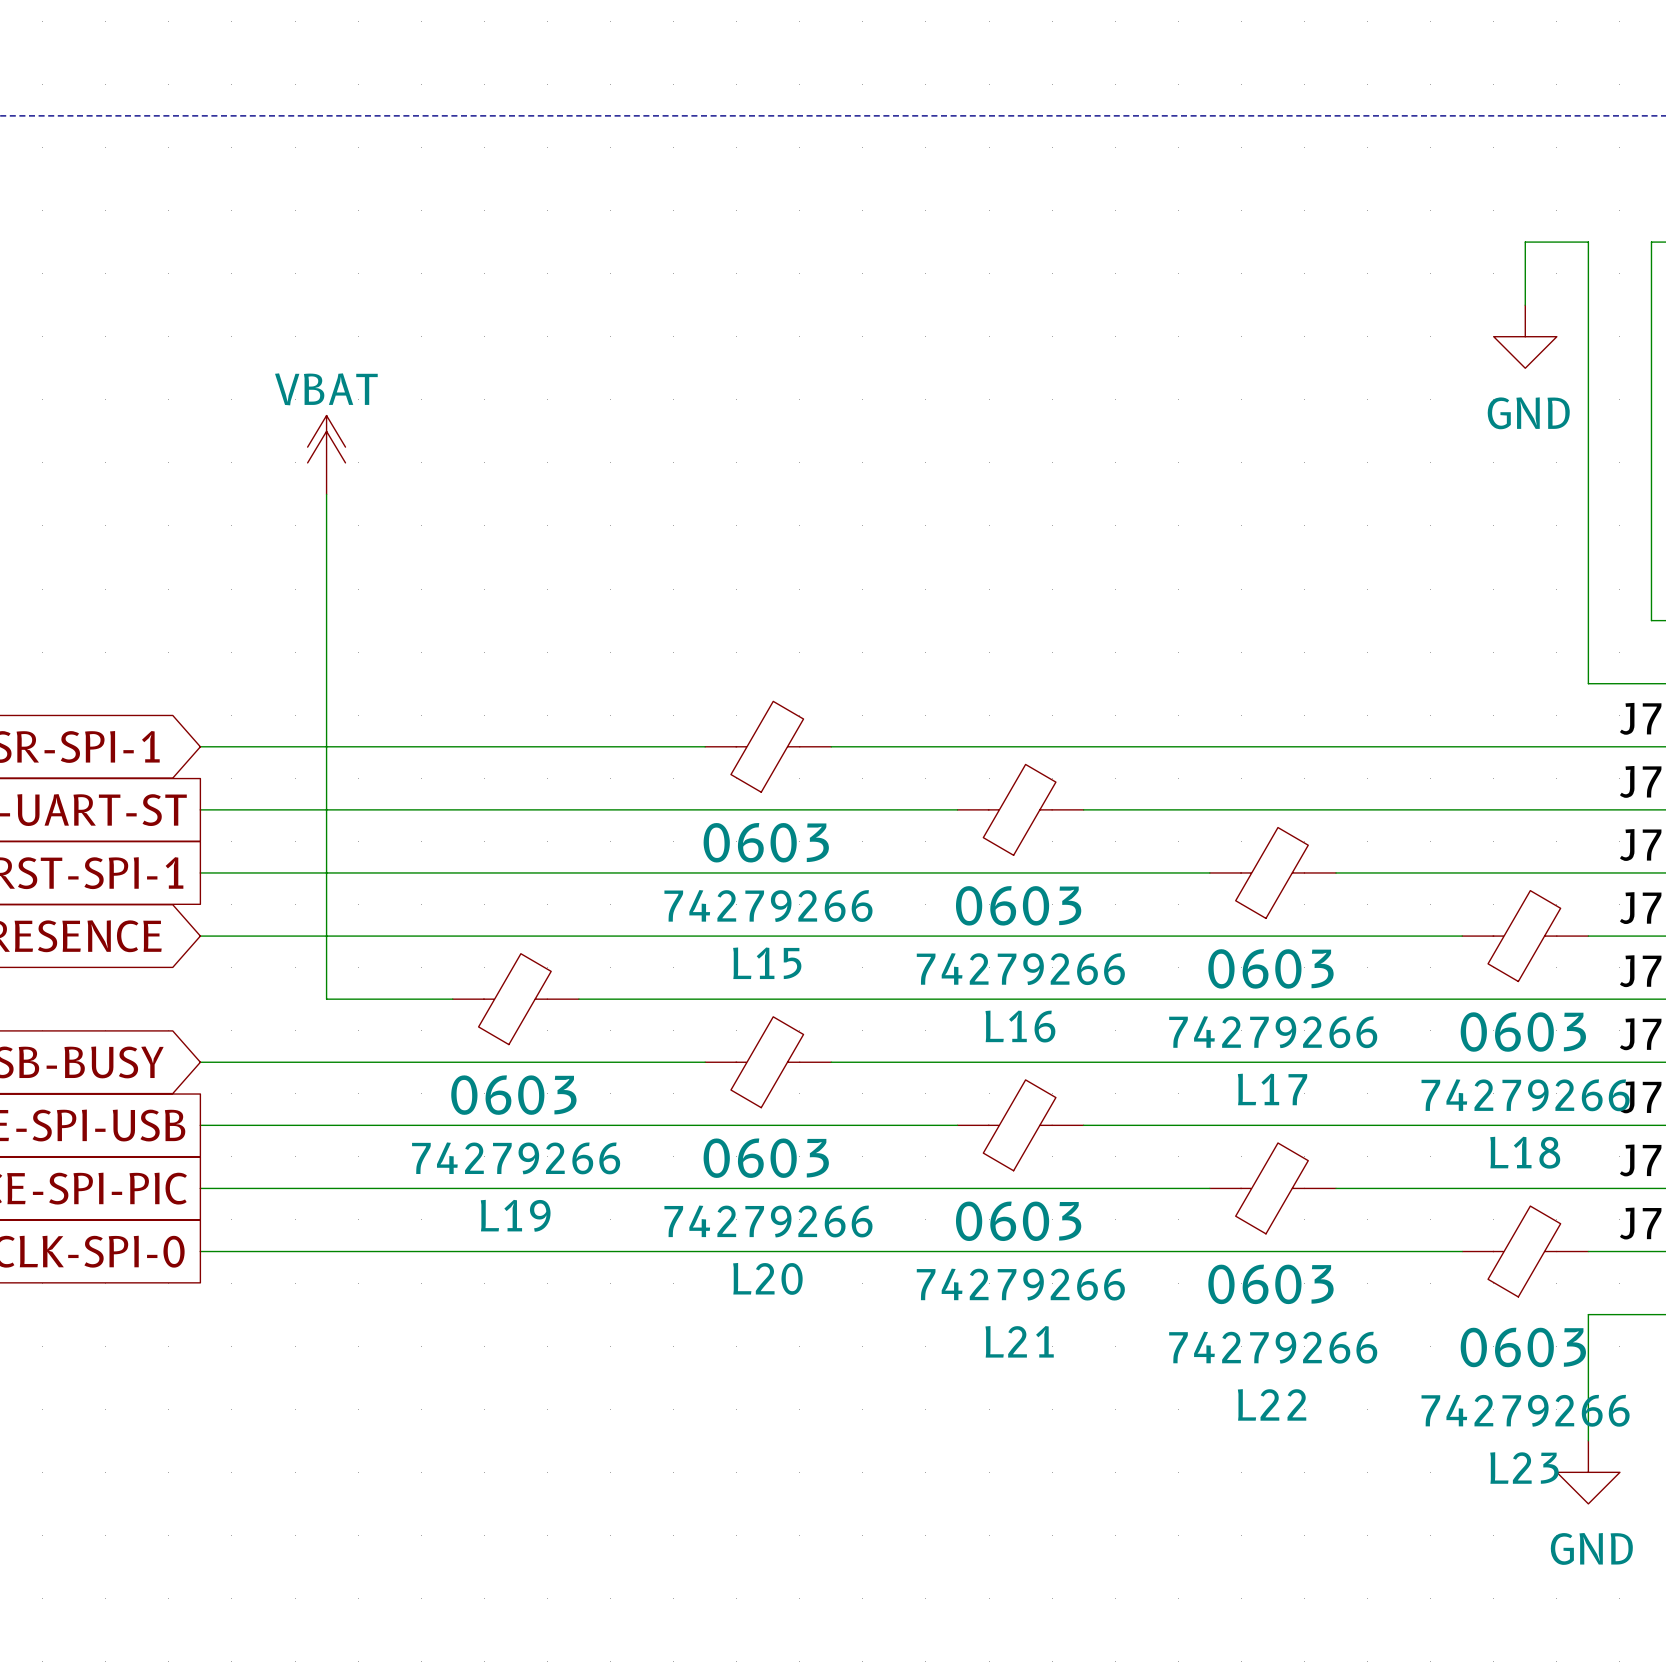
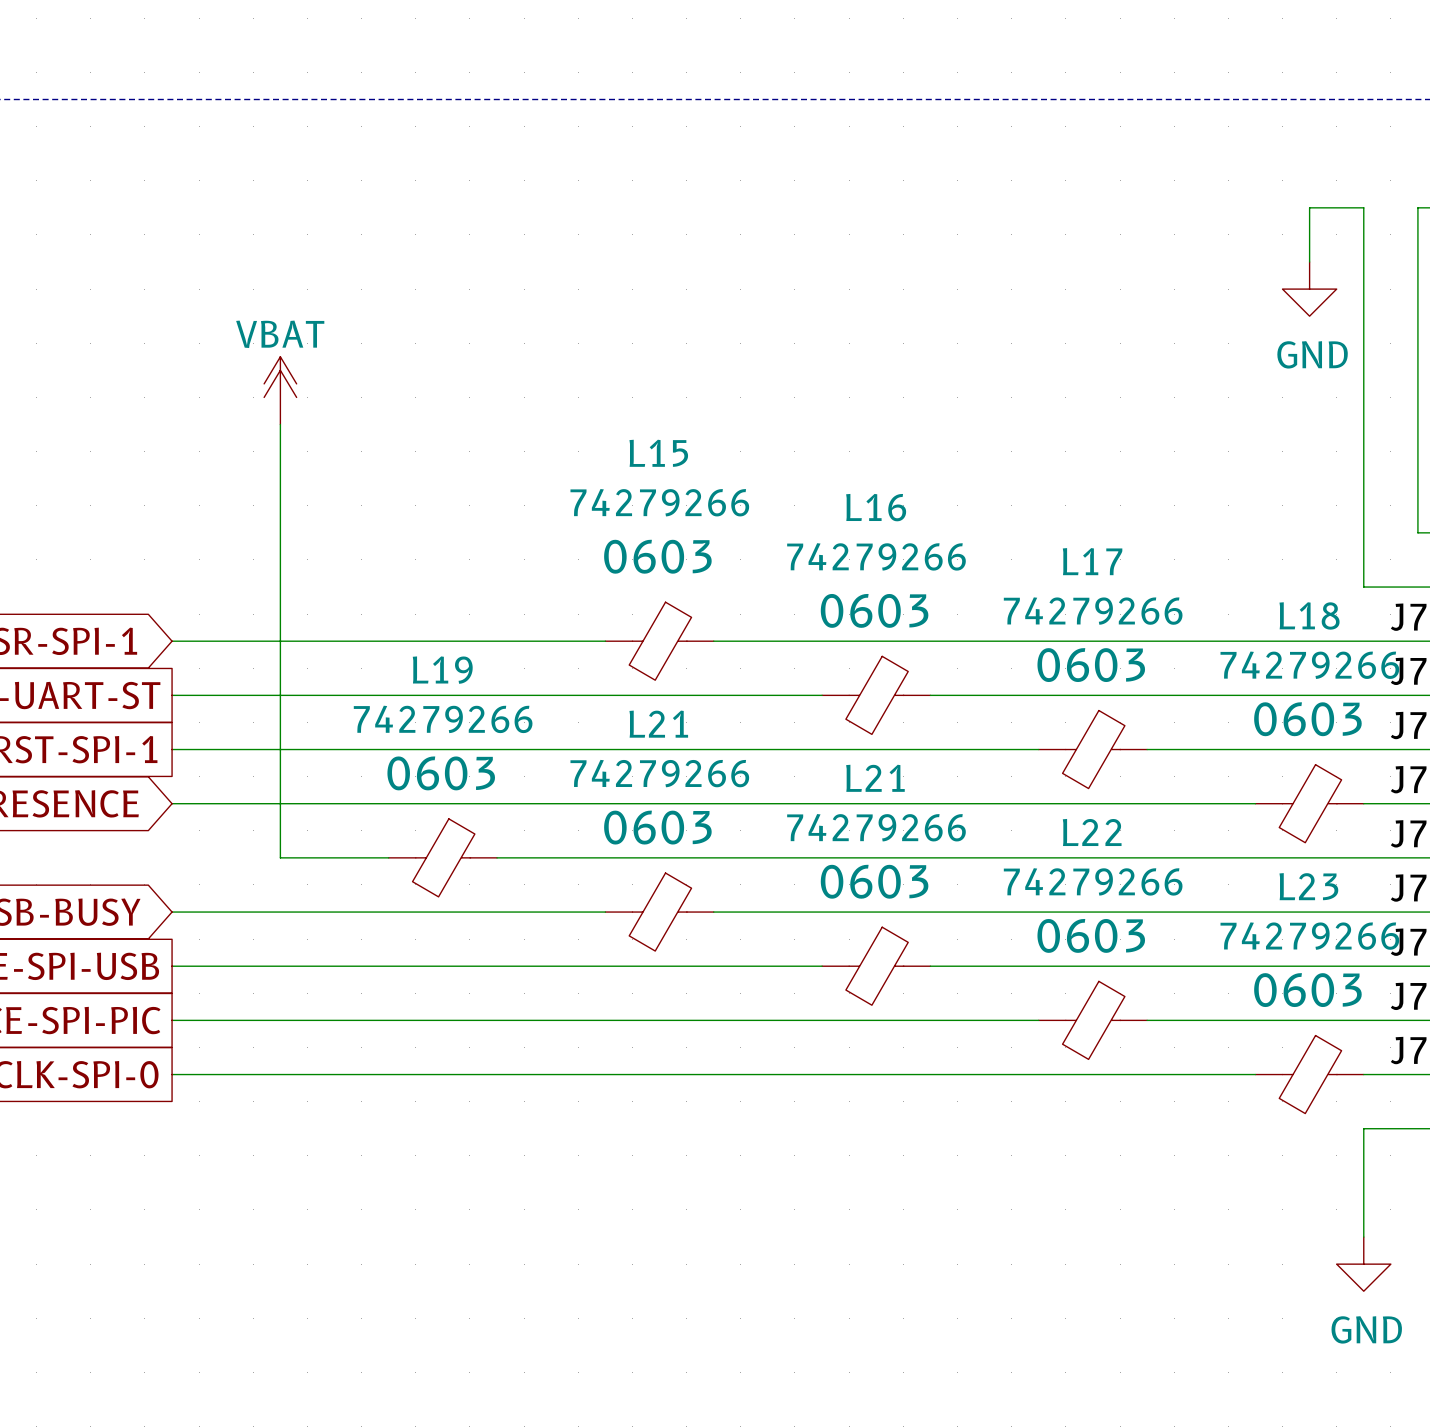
L15 rotation: 0° (767, 746) -> 180° (660, 641)
L16 rotation: 0° (1019, 809) -> 180° (877, 695)
L17 rotation: 0° (1271, 872) -> 180° (1093, 749)
L18 rotation: 0° (1524, 936) -> 180° (1310, 803)
L19 rotation: 0° (514, 999) -> 180° (443, 857)
L20: 74279266 (768, 1062) -> none
L21: none -> 74279266 (659, 912)
L21 rotation: 0° (1019, 1125) -> 180° (877, 966)
L22 rotation: 0° (1271, 1188) -> 180° (1093, 1020)
L23 rotation: 0° (1524, 1251) -> 180° (1310, 1074)

